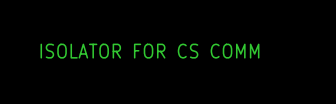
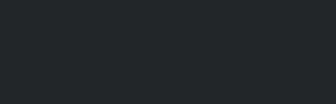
text: ISOLATOR FOR CS COMM (149, 51) -> none

